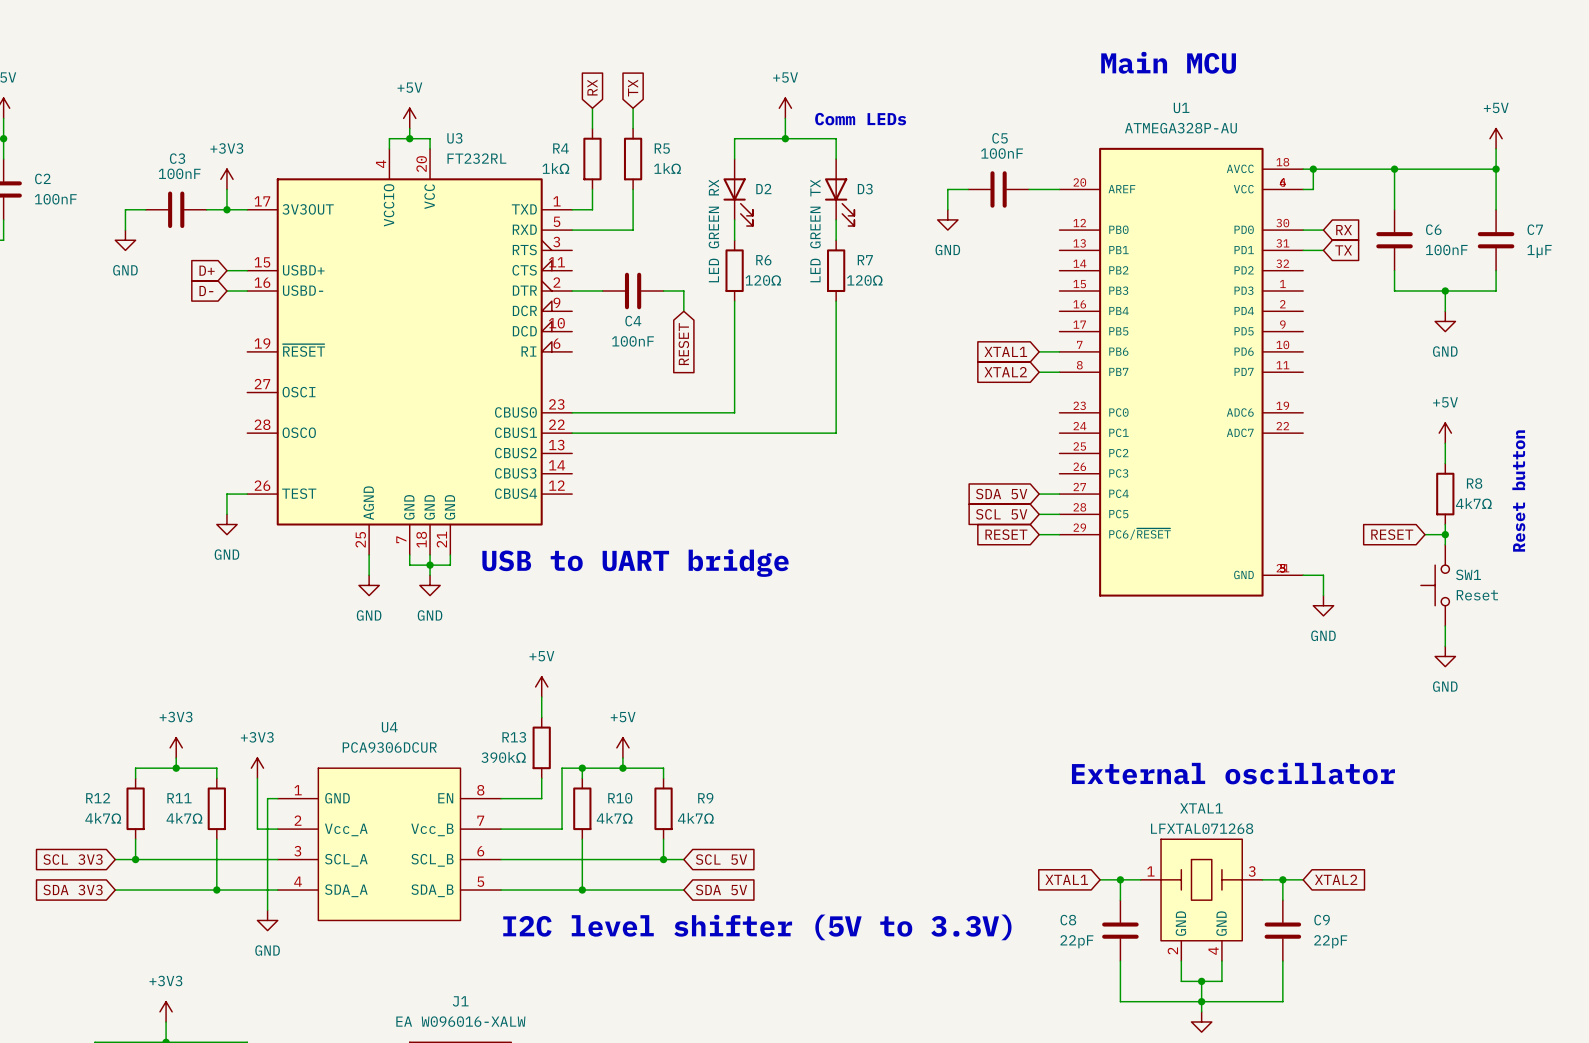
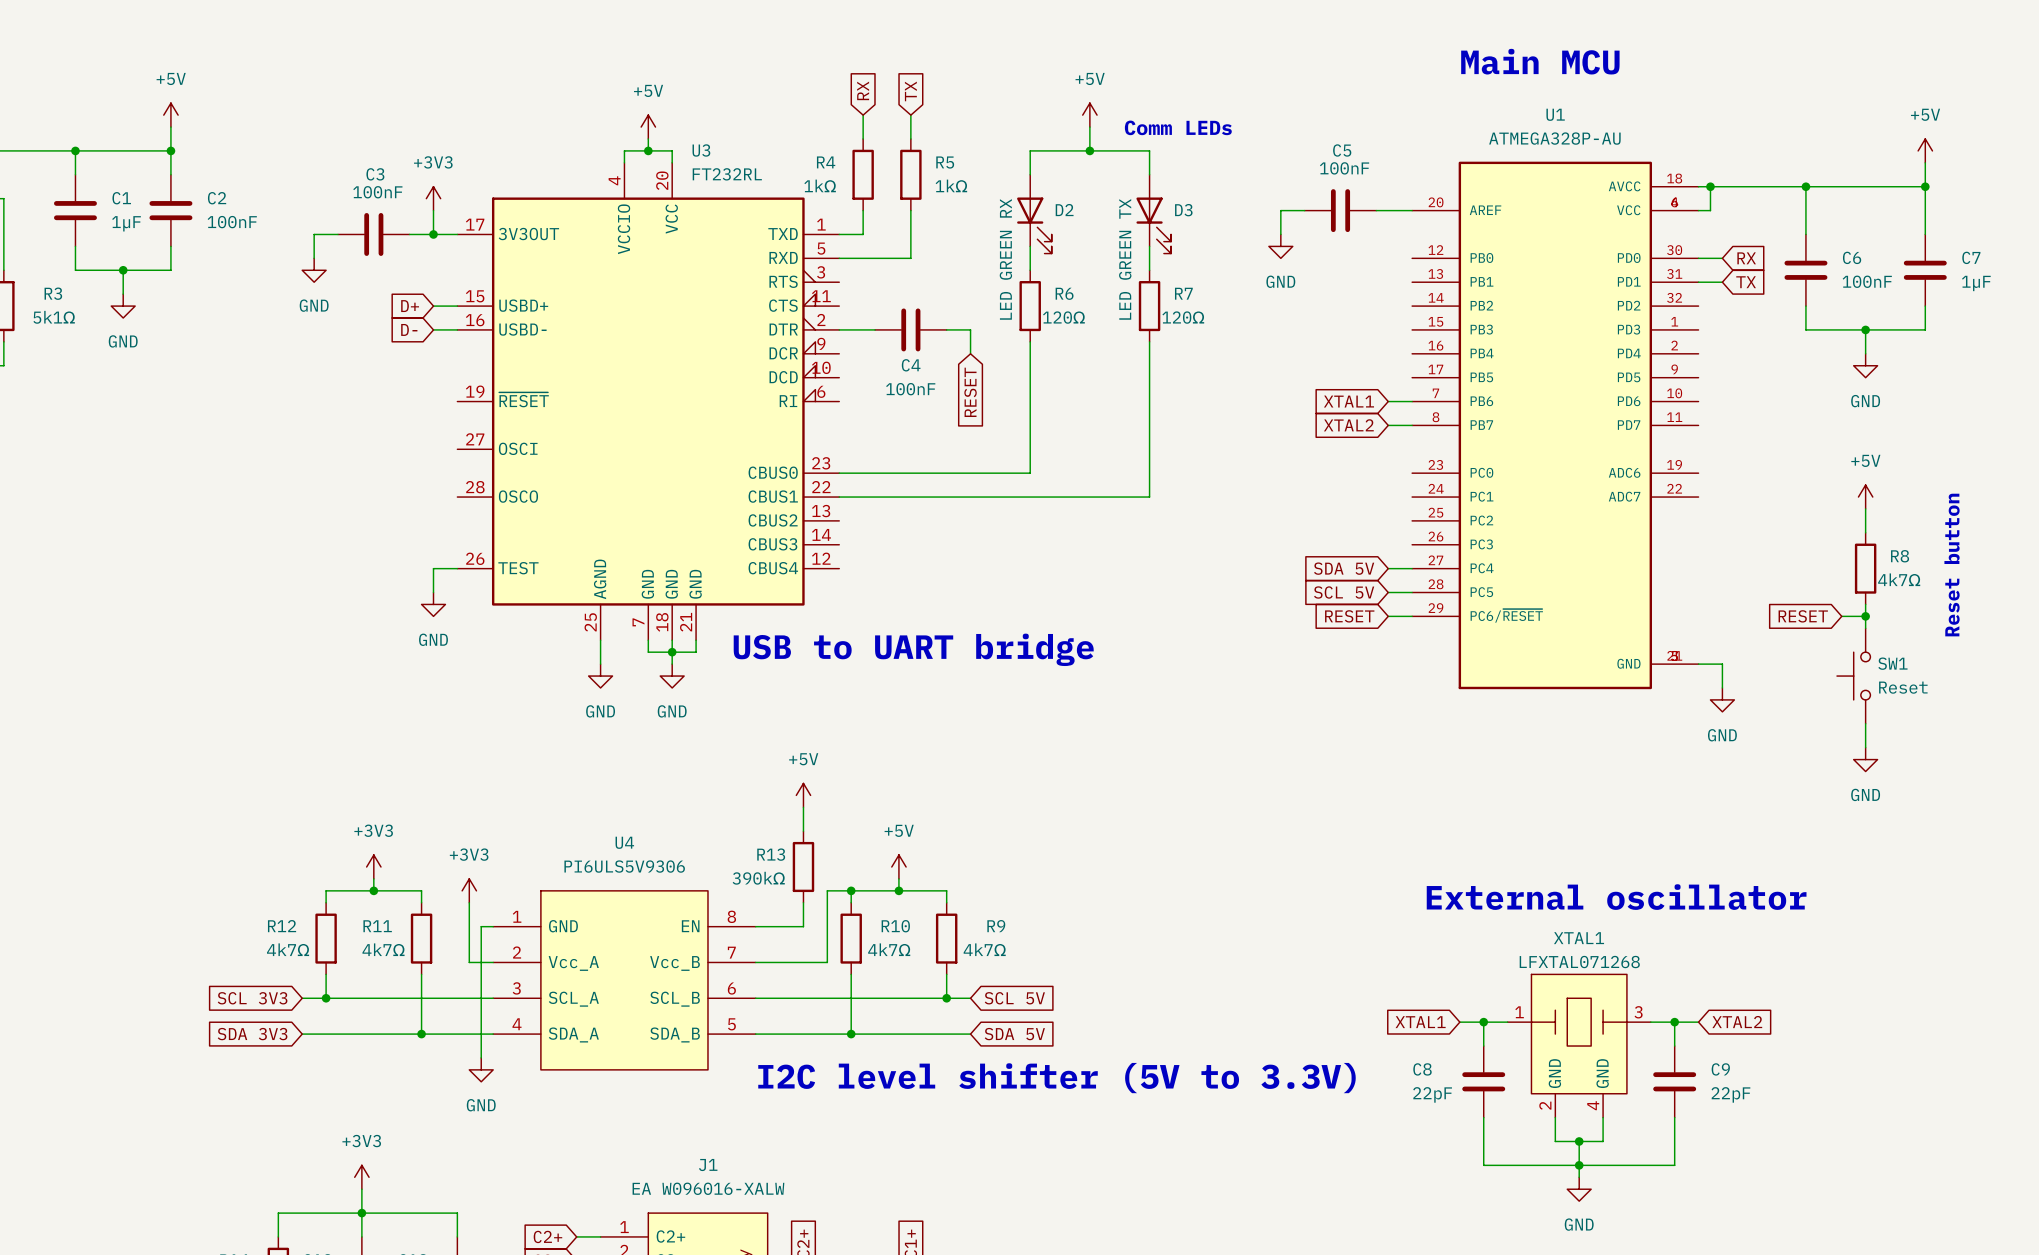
U4 value: PCA9306DCUR (389, 747) -> PI6ULS5V9306 (624, 866)

